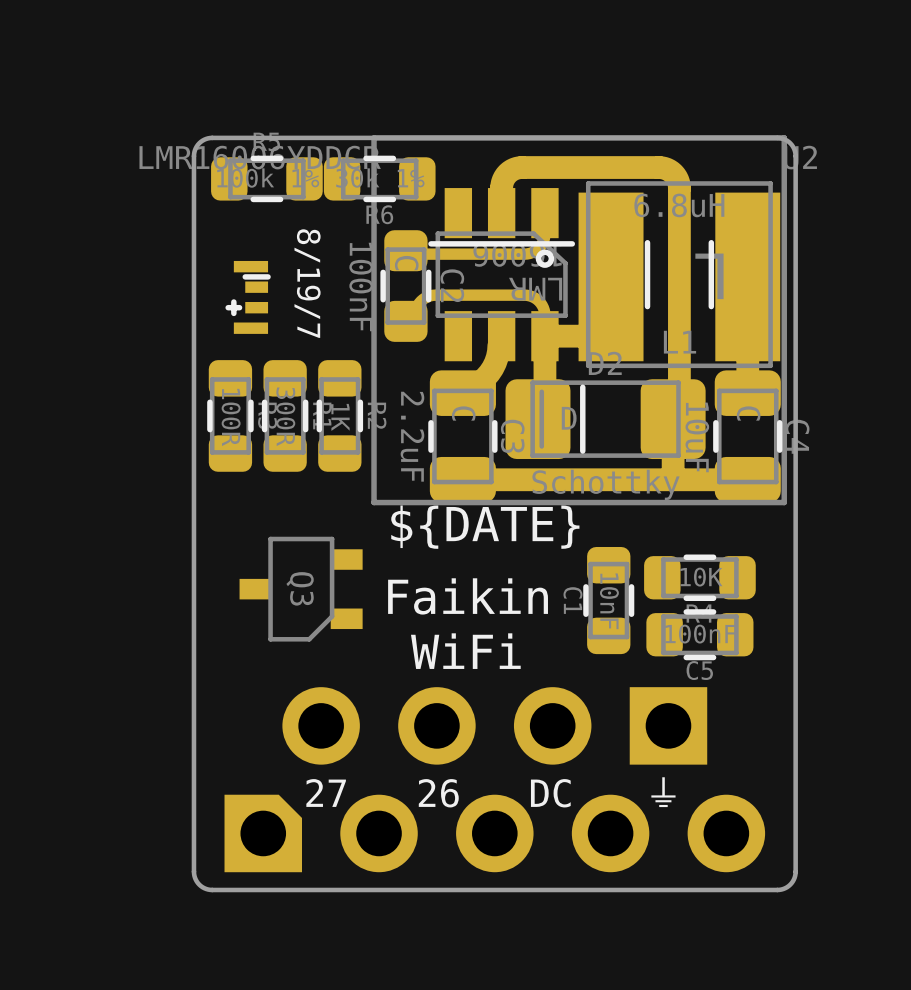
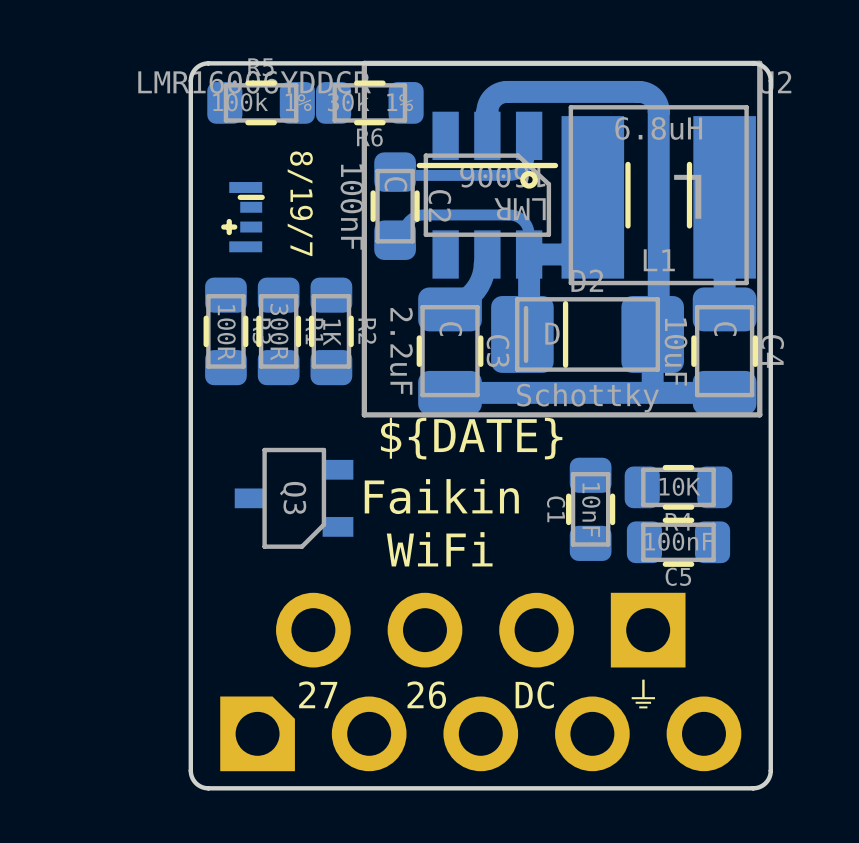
text position: Faikin (468, 596) -> Faikin (441, 496)
text position: WiFi (465, 651) -> WiFi (439, 549)

